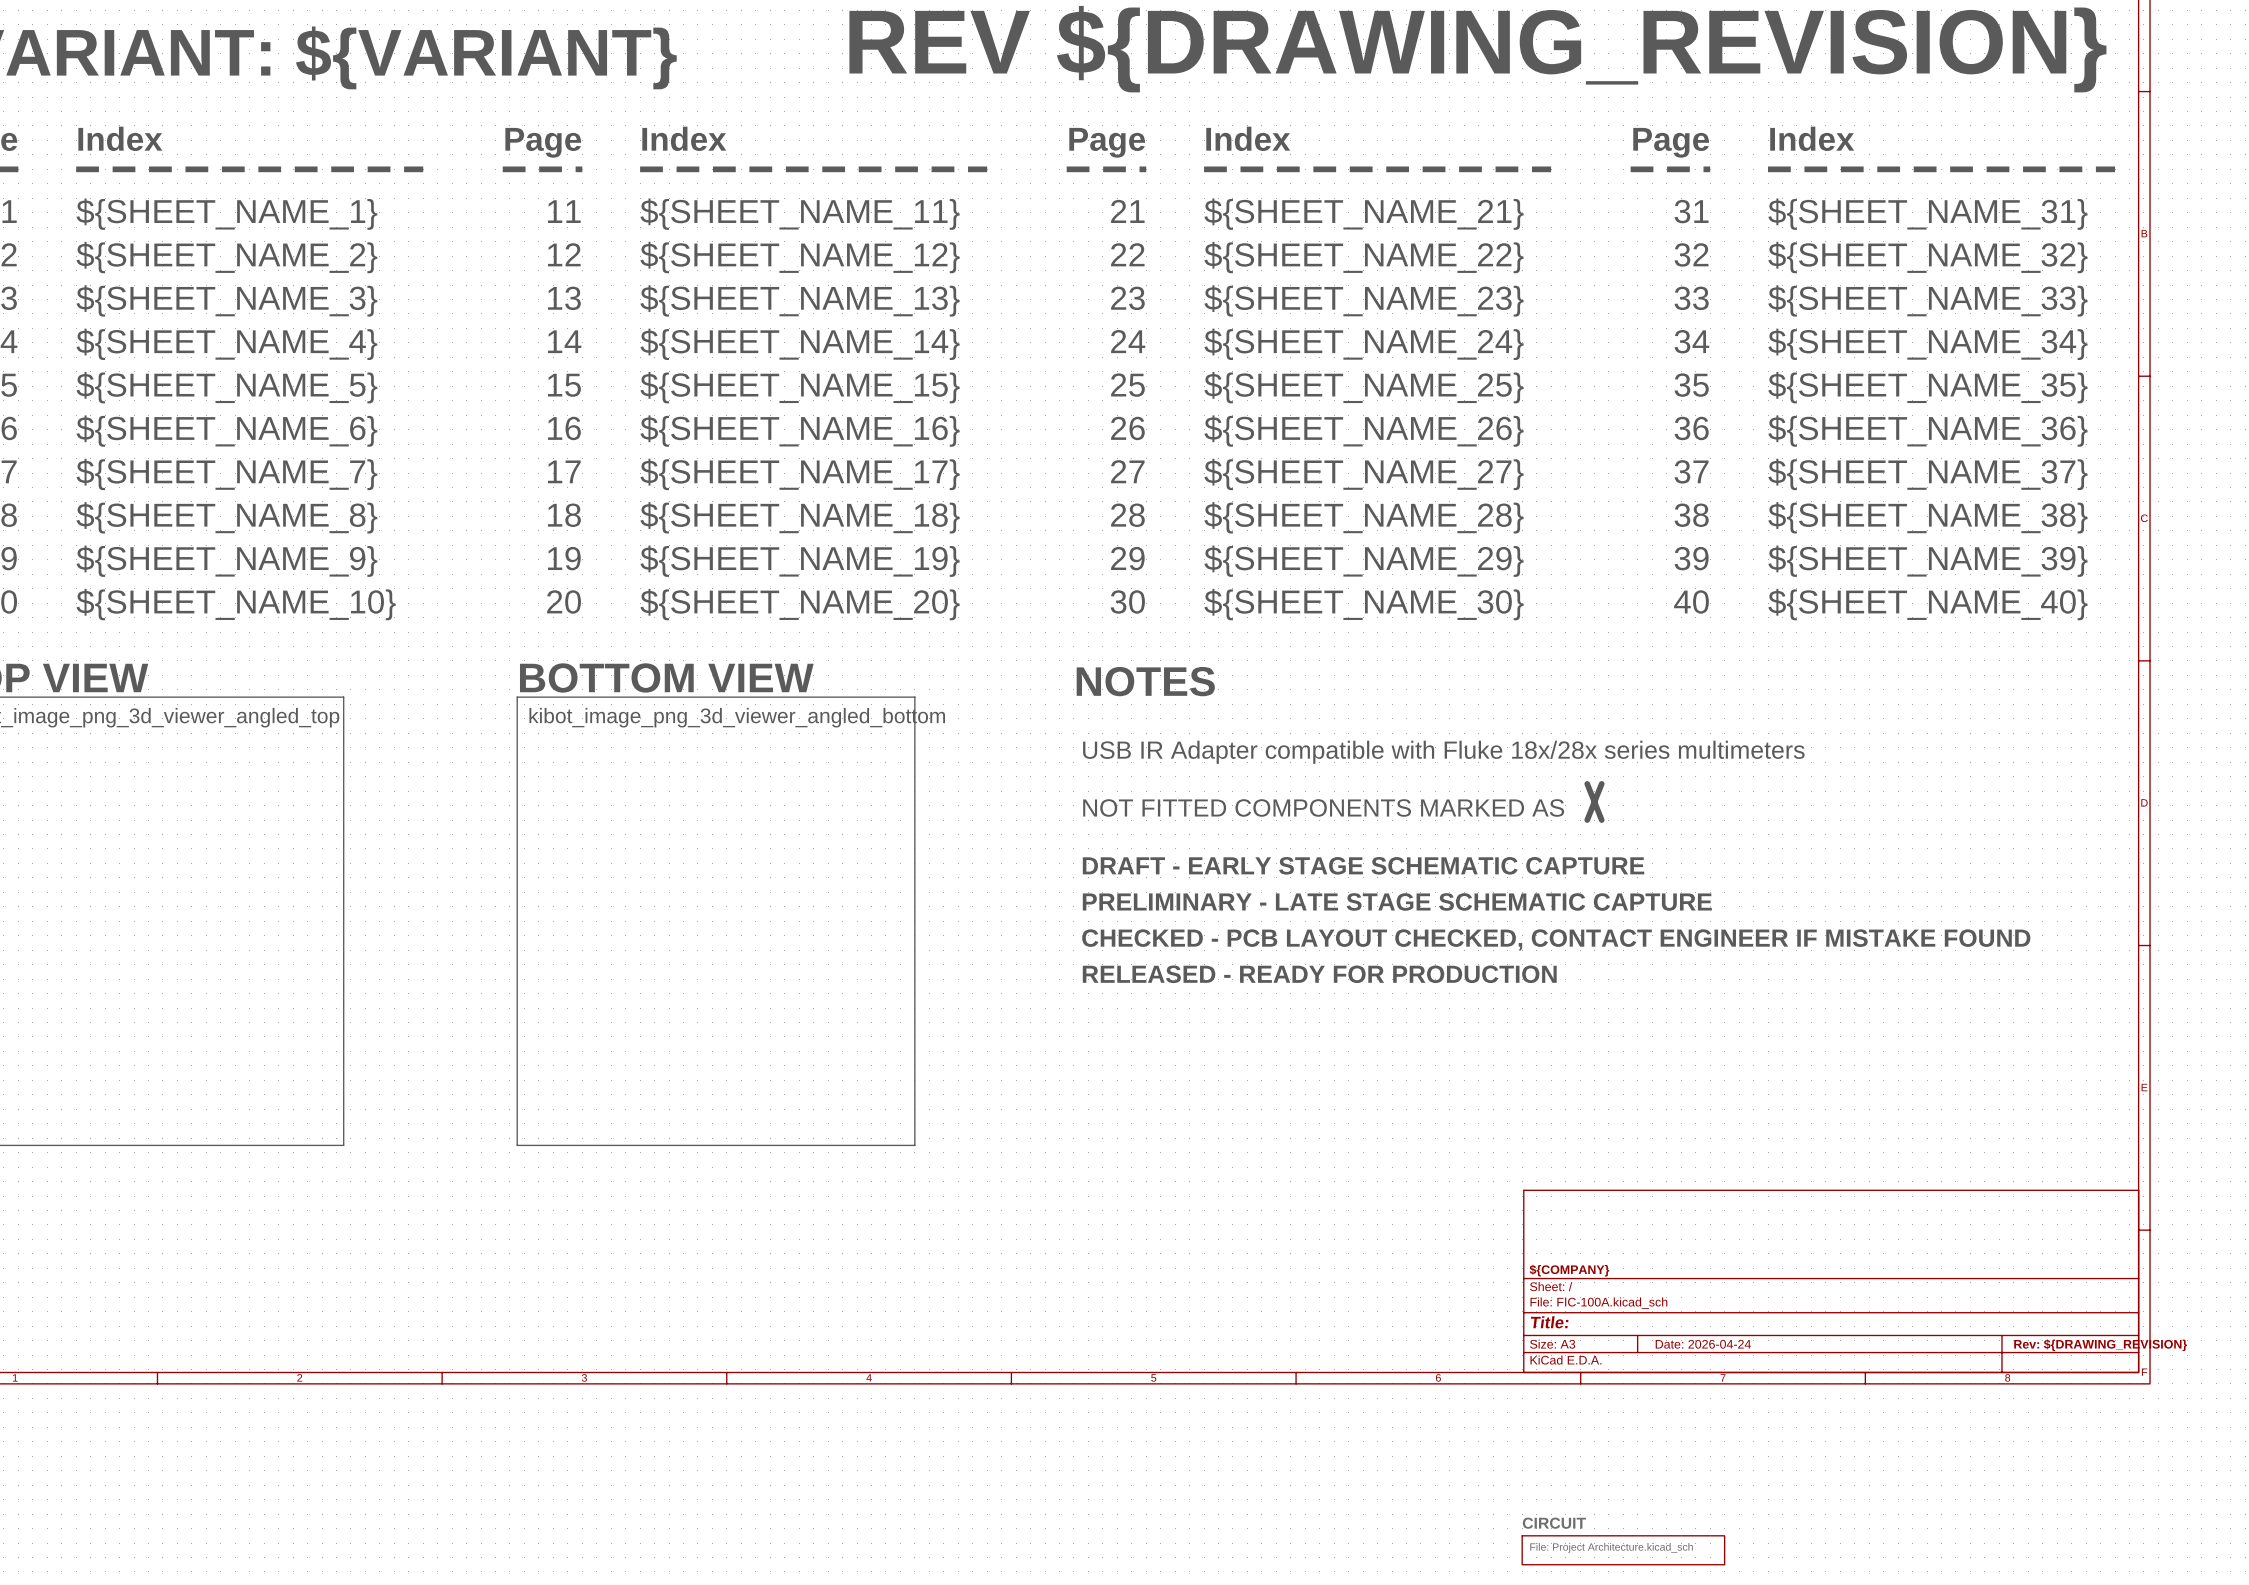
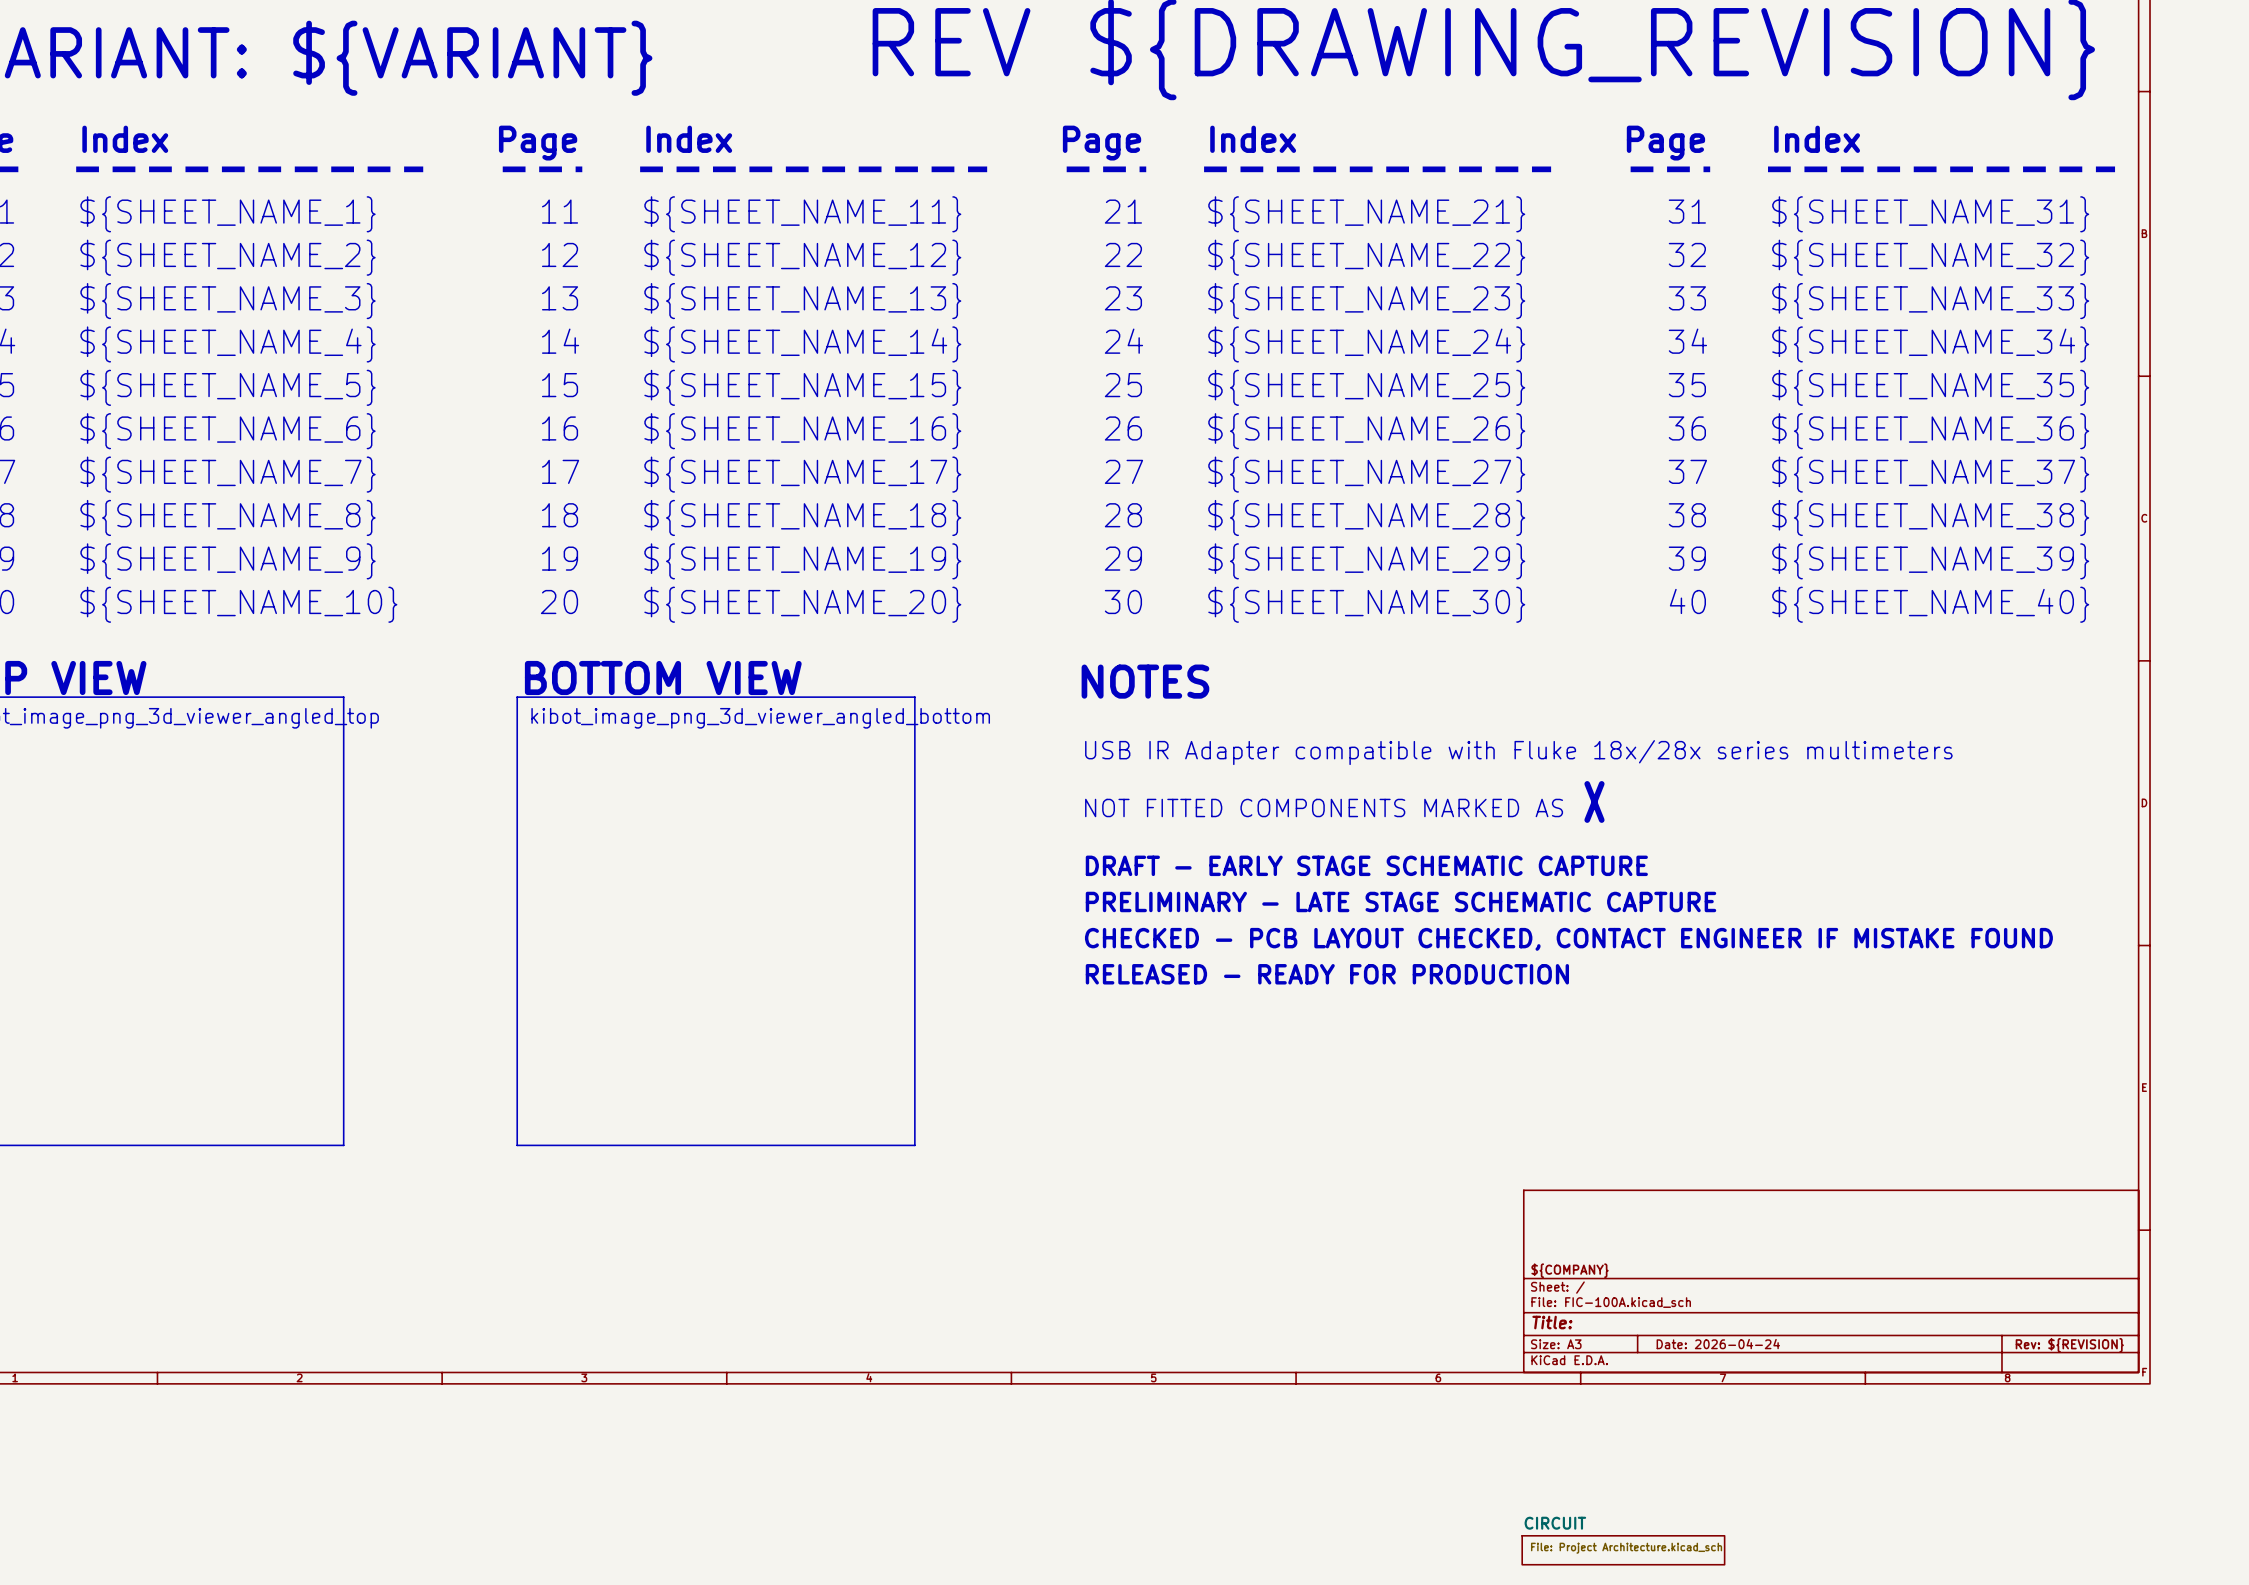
title block: Rev: ${DRAWING_REVISION} (2100, 1345) -> Rev: ${REVISION} (2069, 1345)

